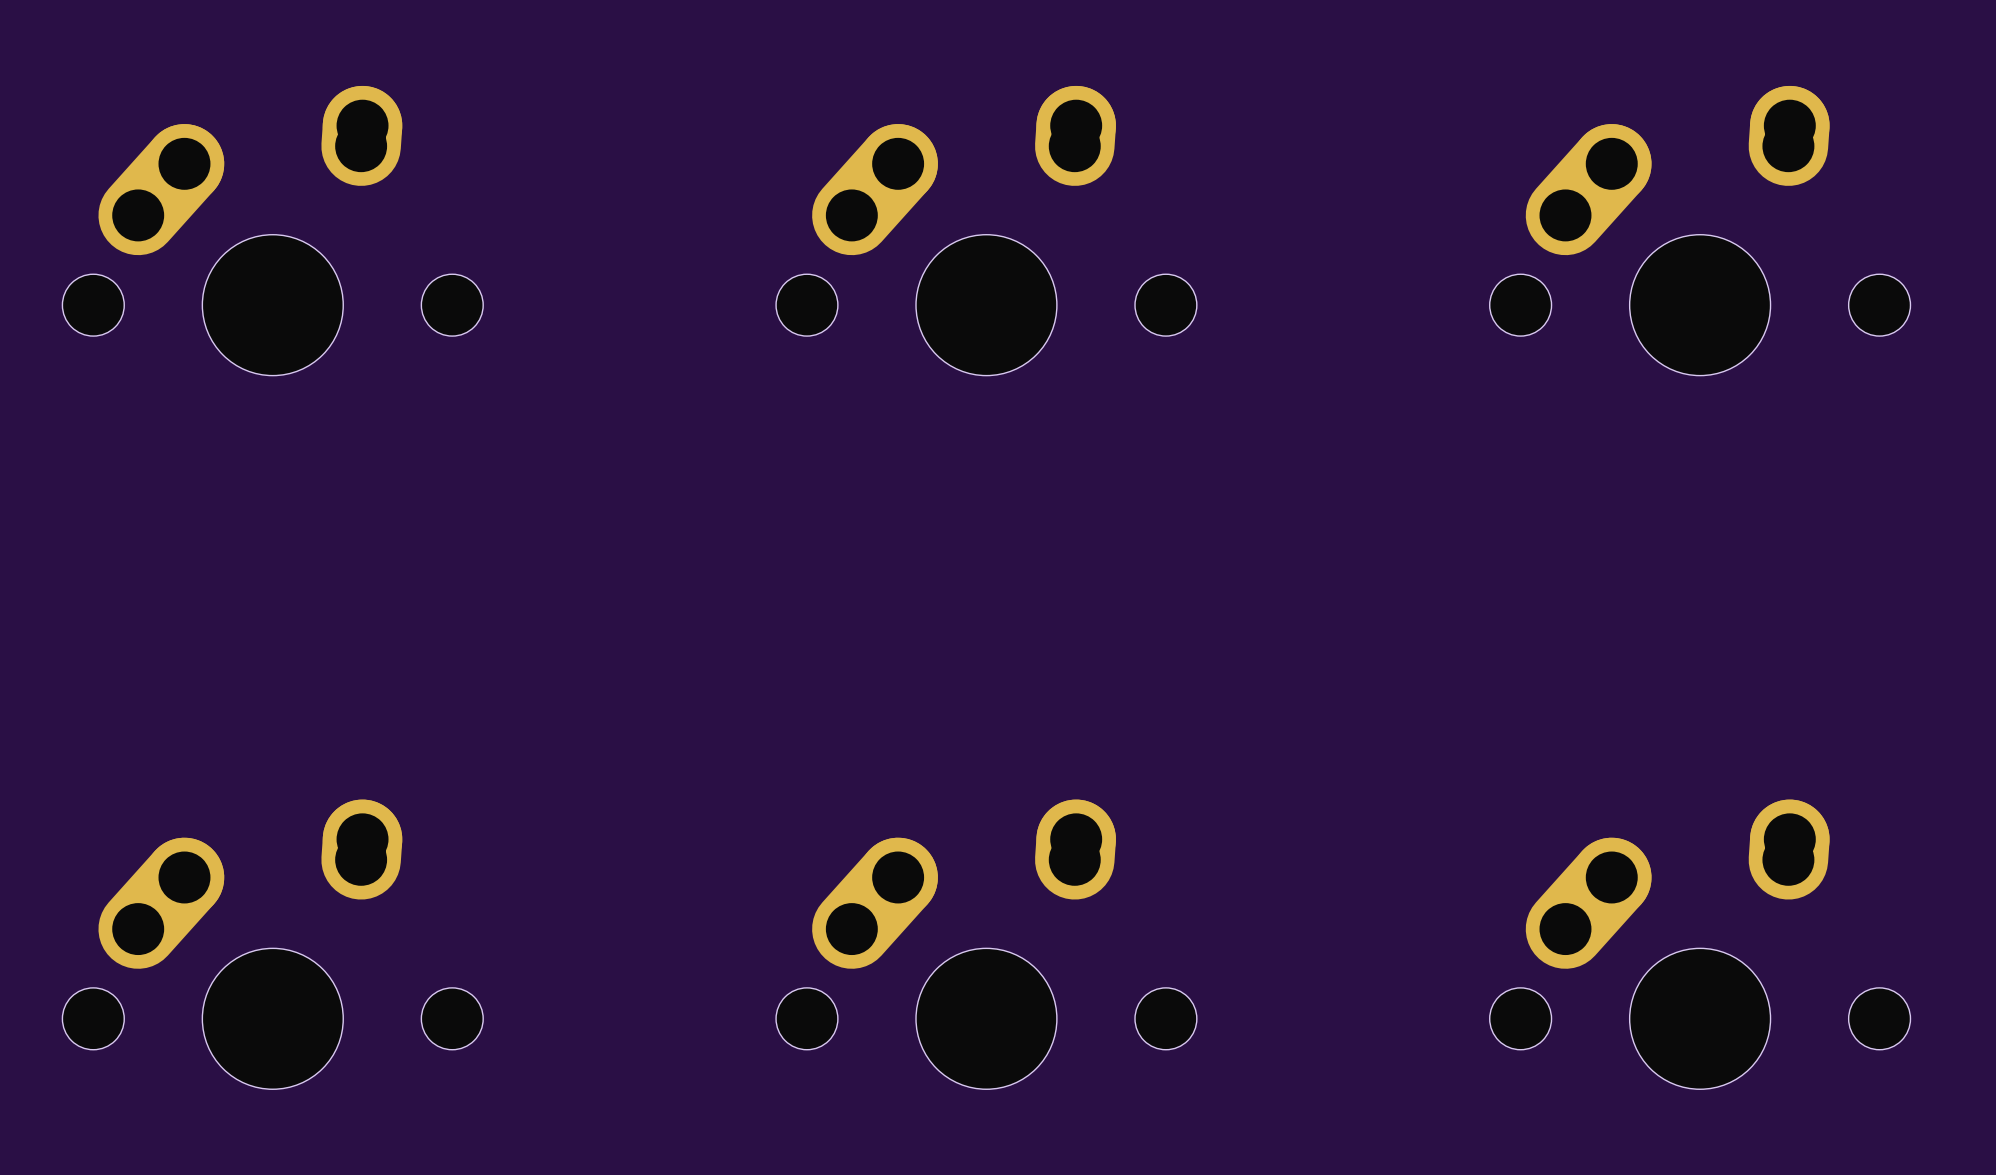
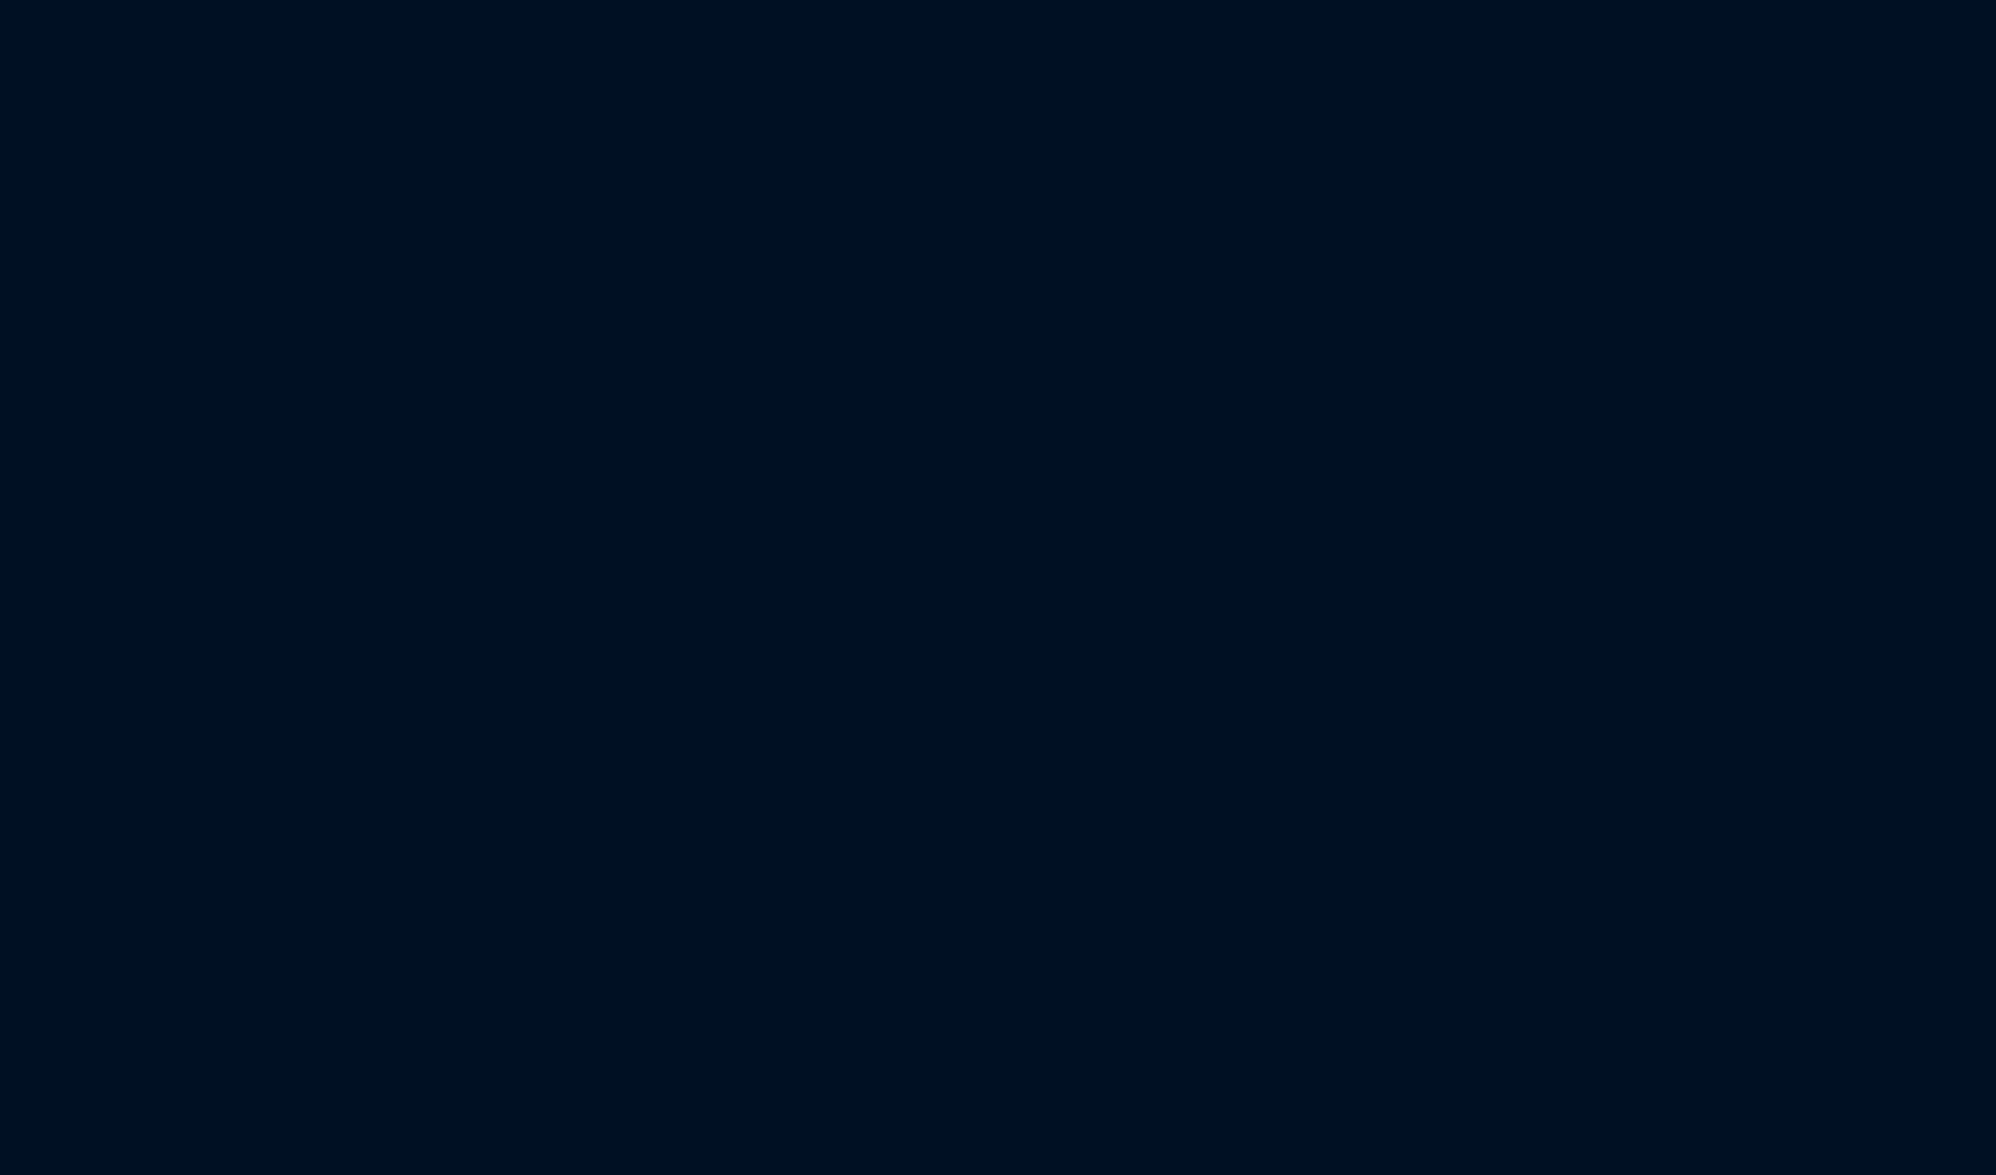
part: (272, 230) -> none
part: (986, 230) -> none
part: (1700, 230) -> none
part: (272, 944) -> none
part: (986, 944) -> none
part: (1700, 944) -> none

